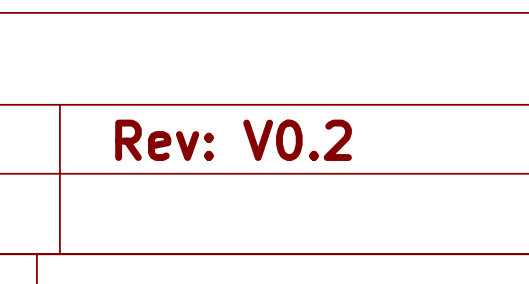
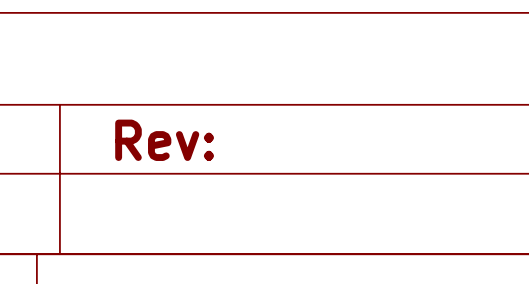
title block: Rev: V0.2 (233, 140) -> Rev: (164, 140)

